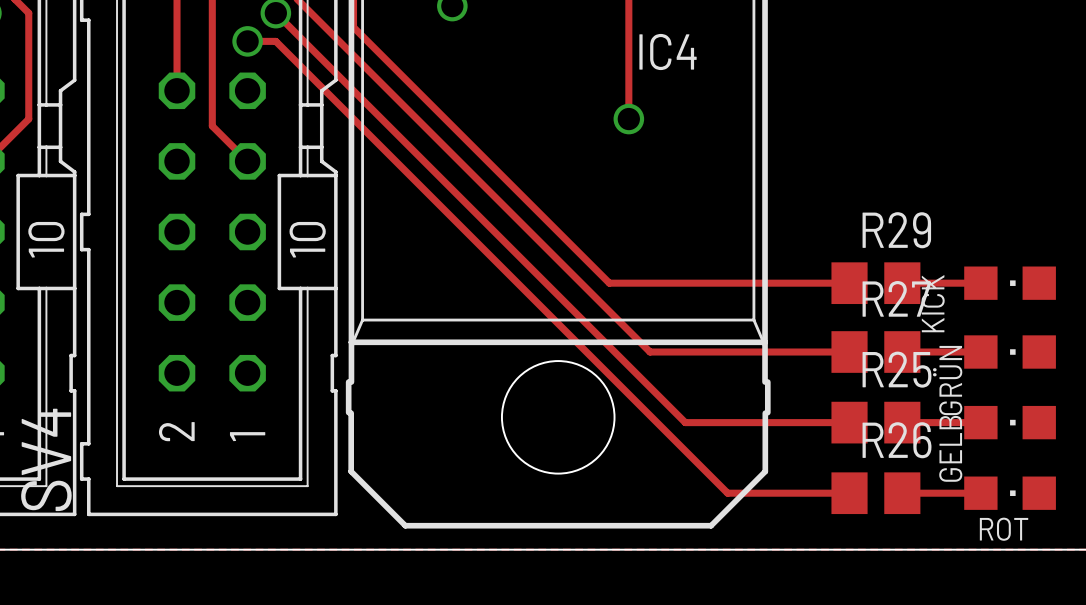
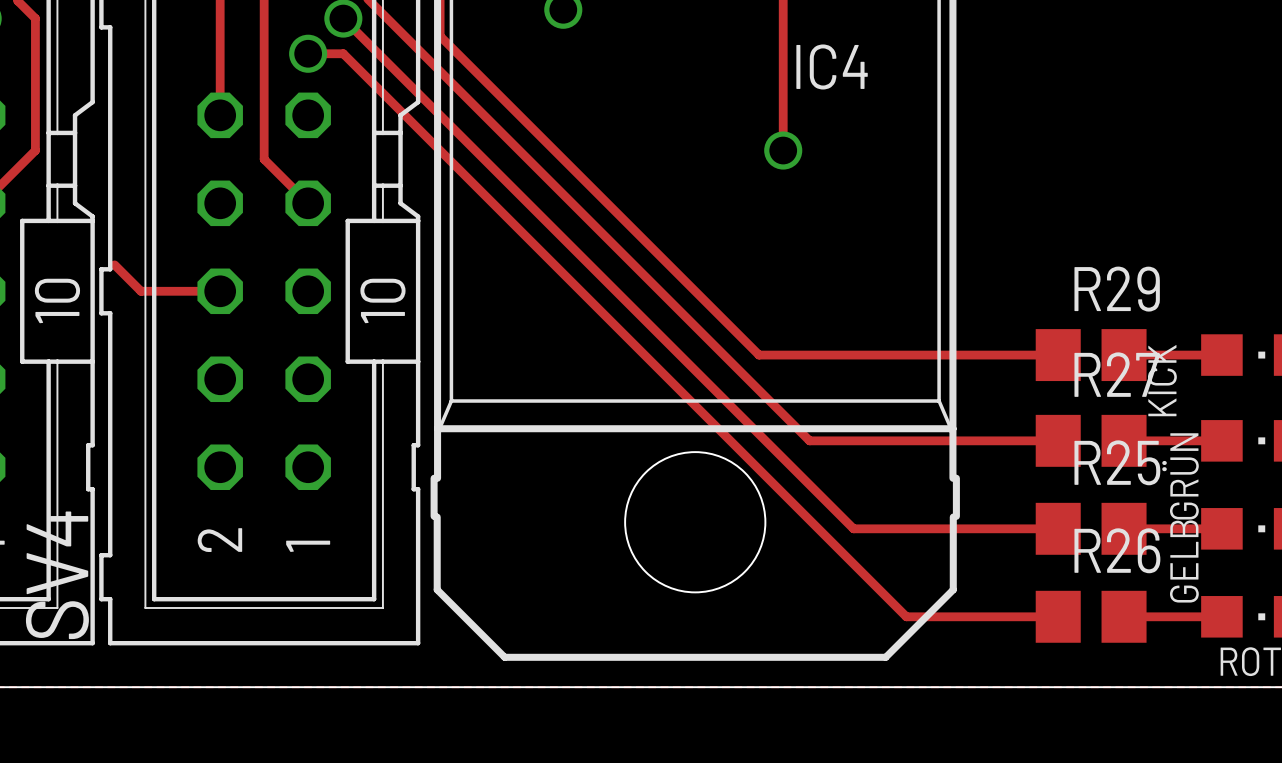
track: none -> (114, 264) (141, 291) (220, 291)

